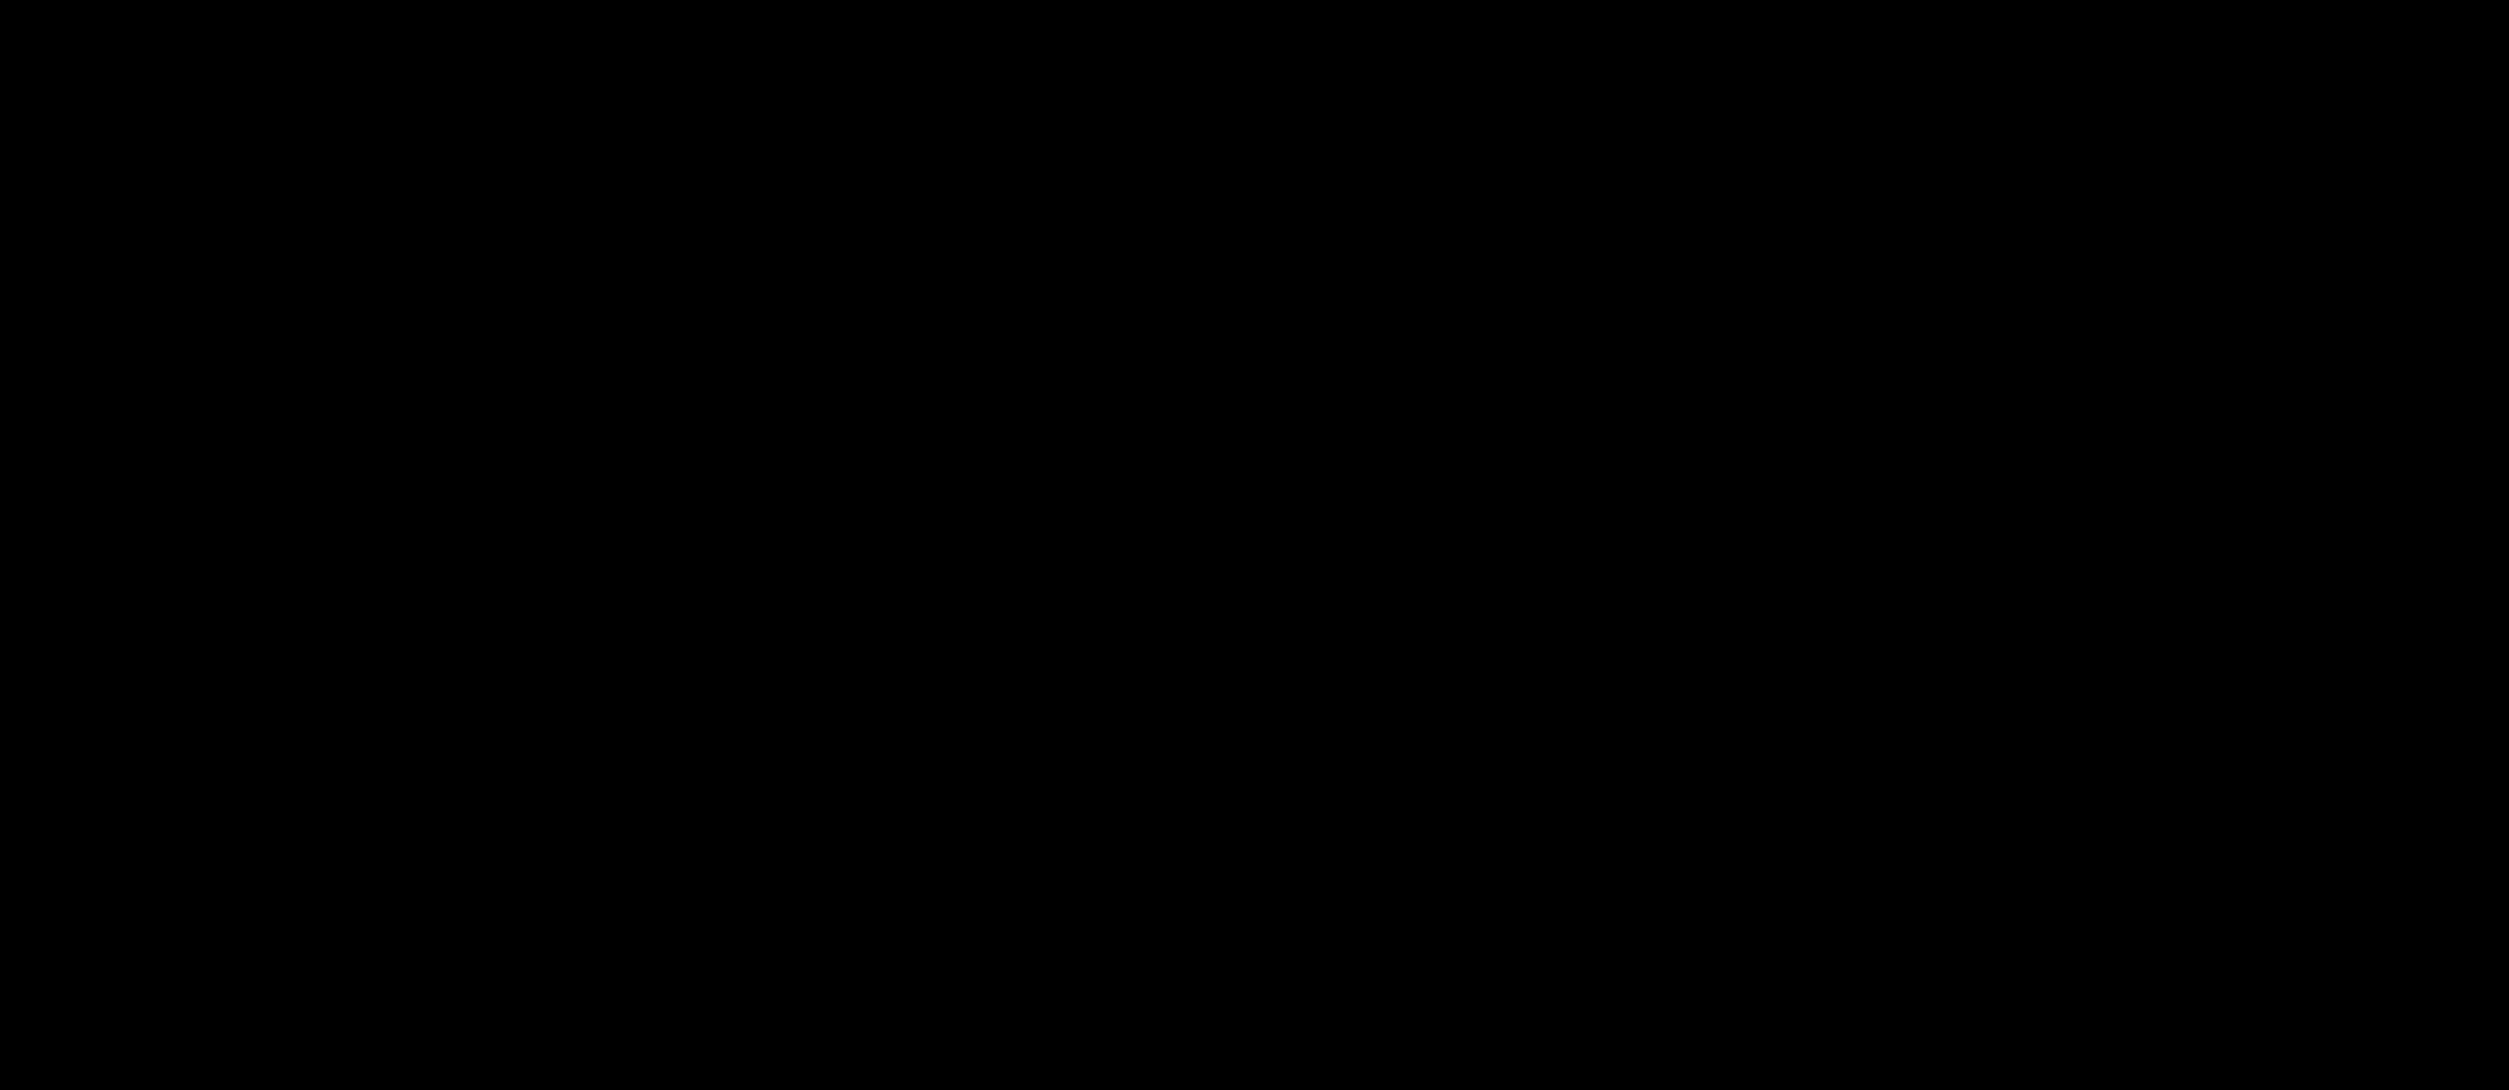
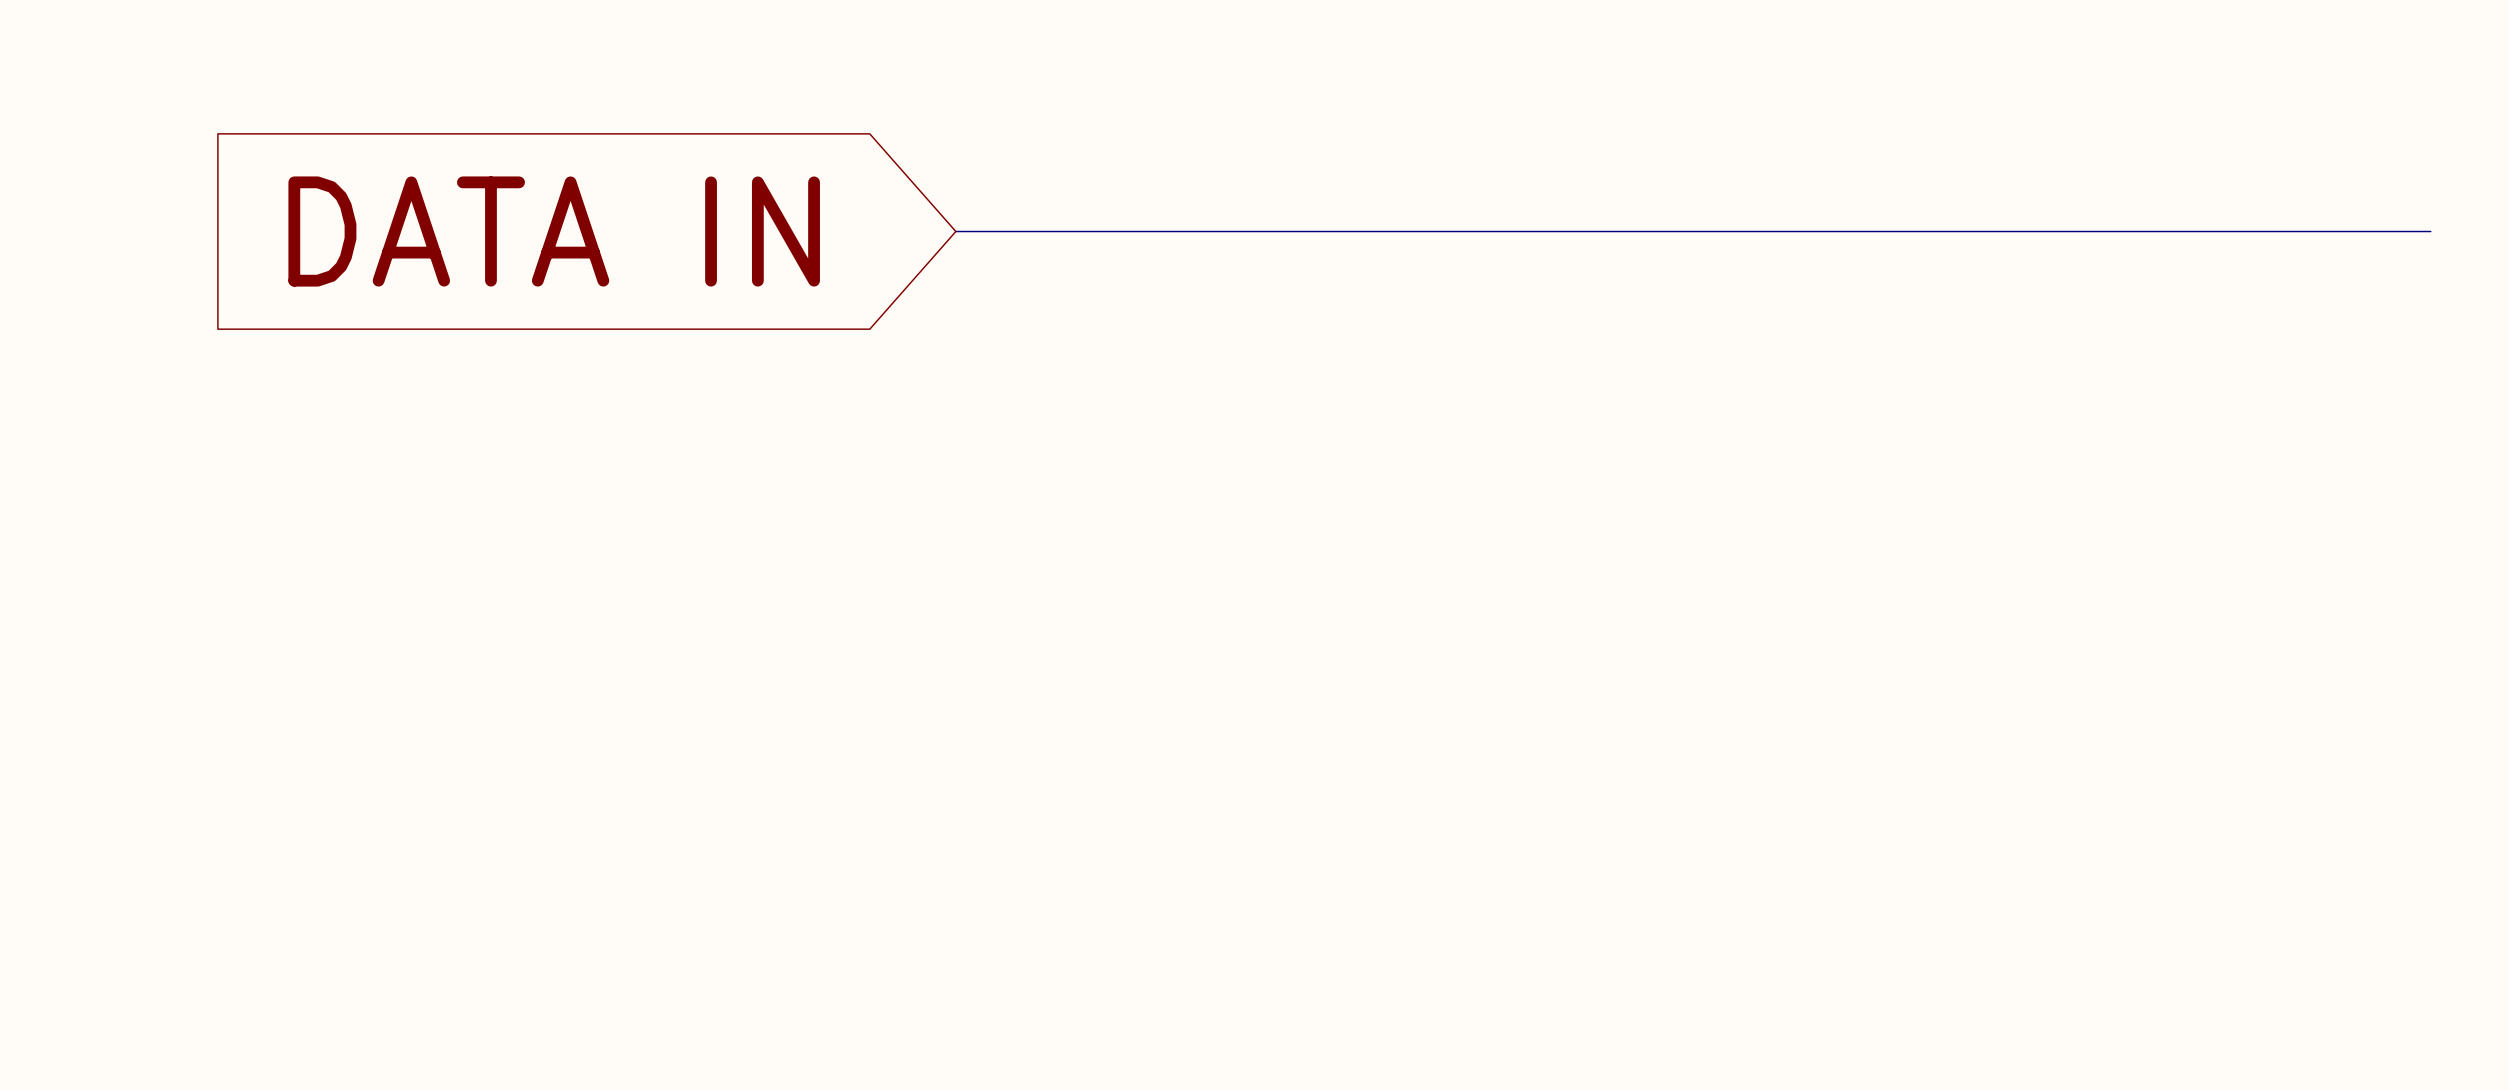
global label: none -> DATA IN (554, 231)
wire: none -> (955, 231) (2430, 231)

